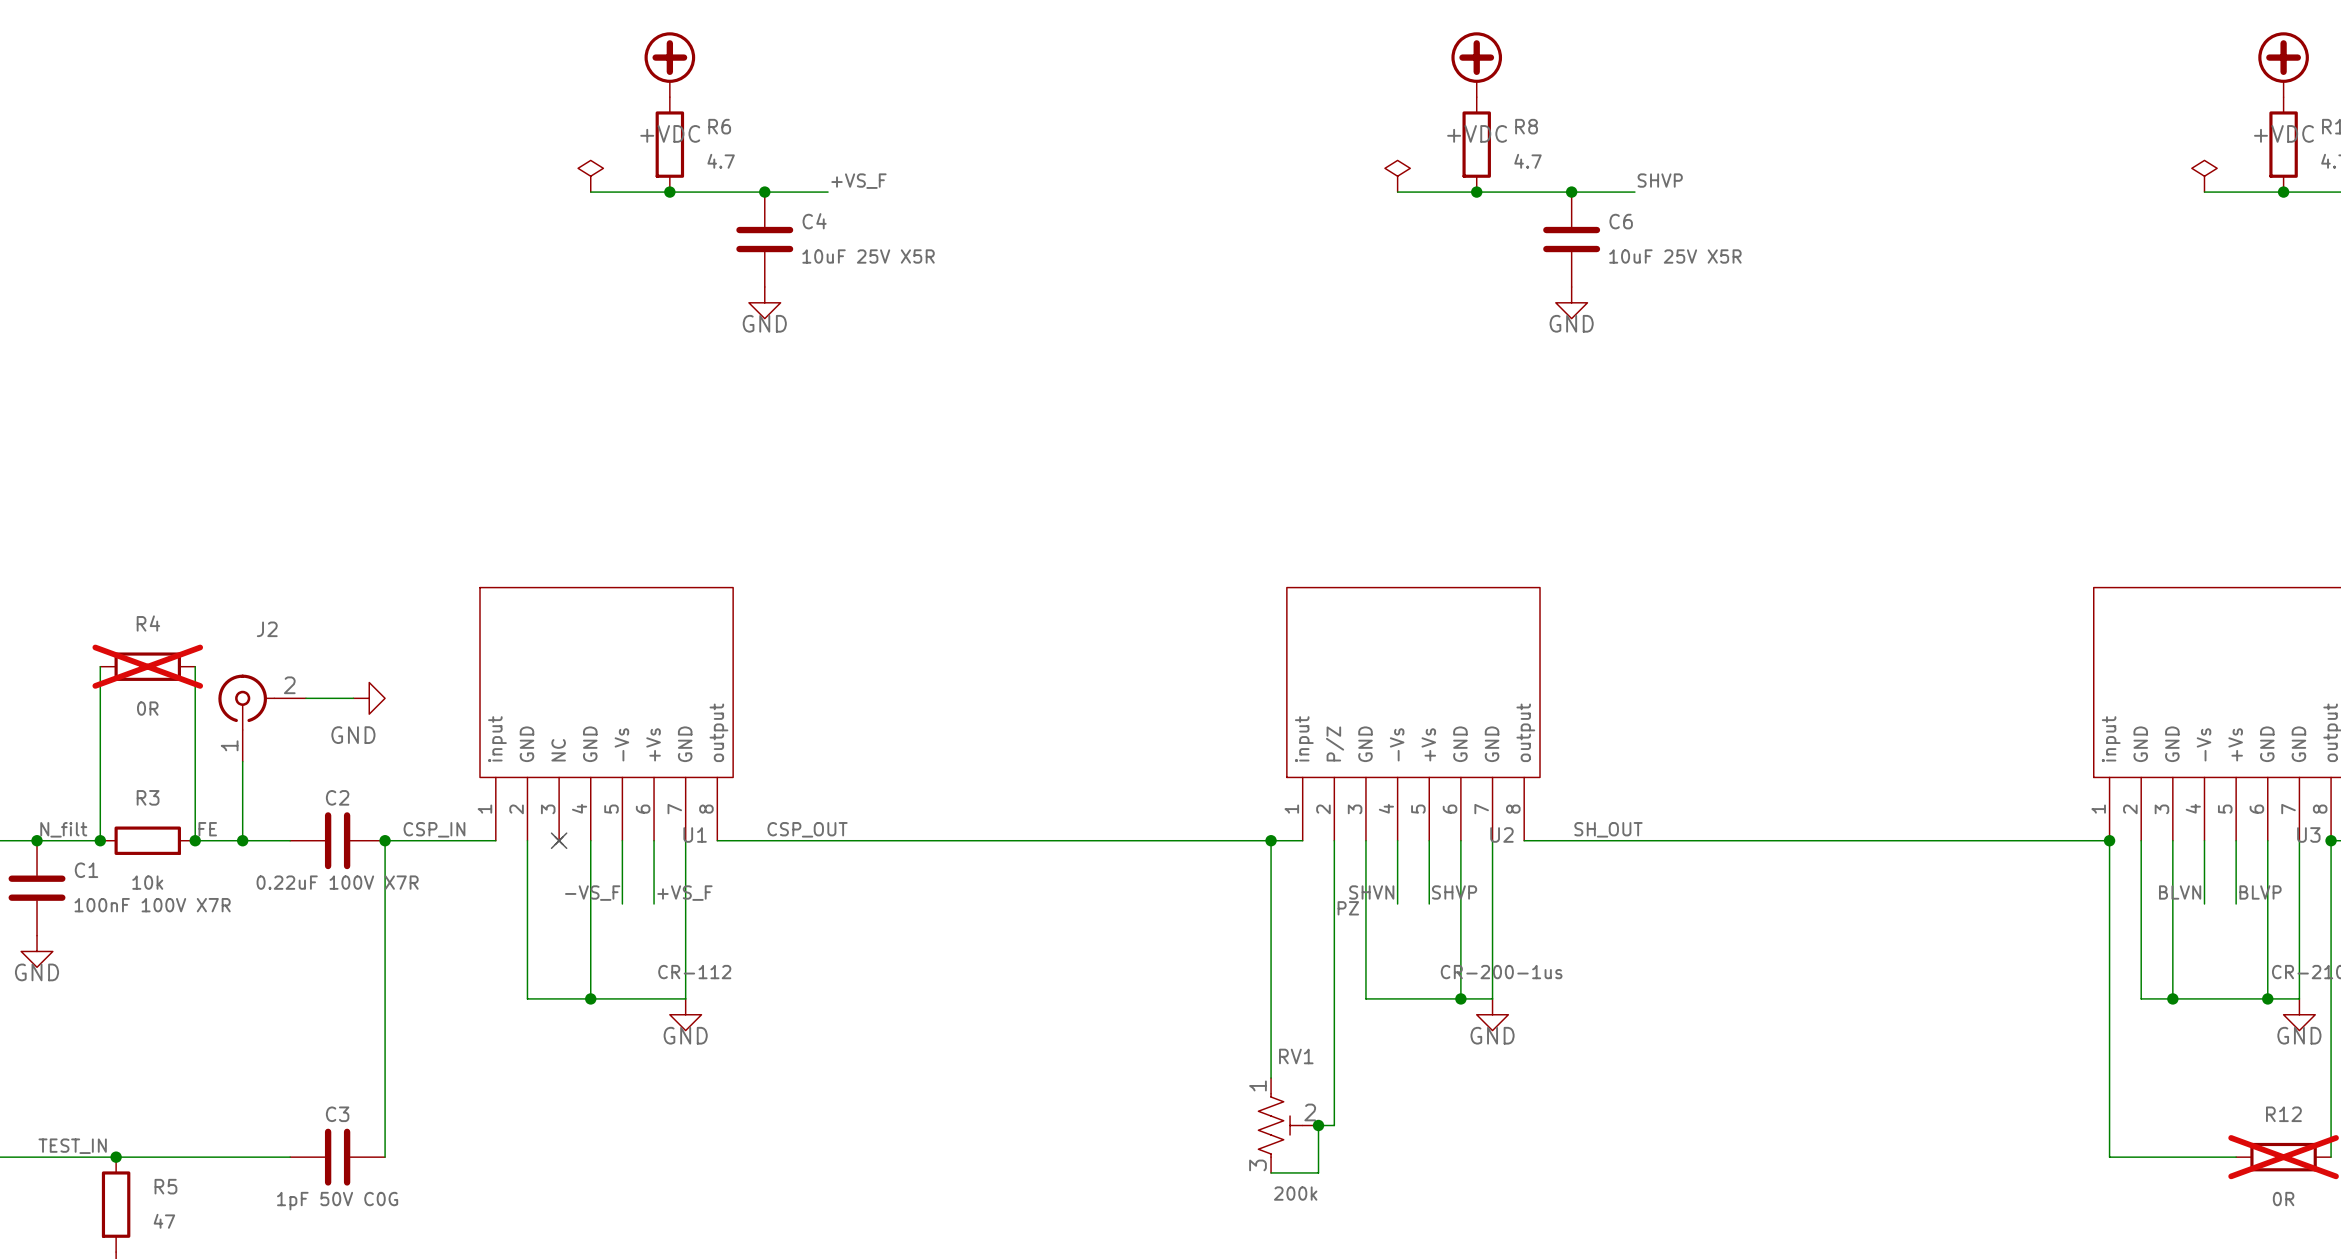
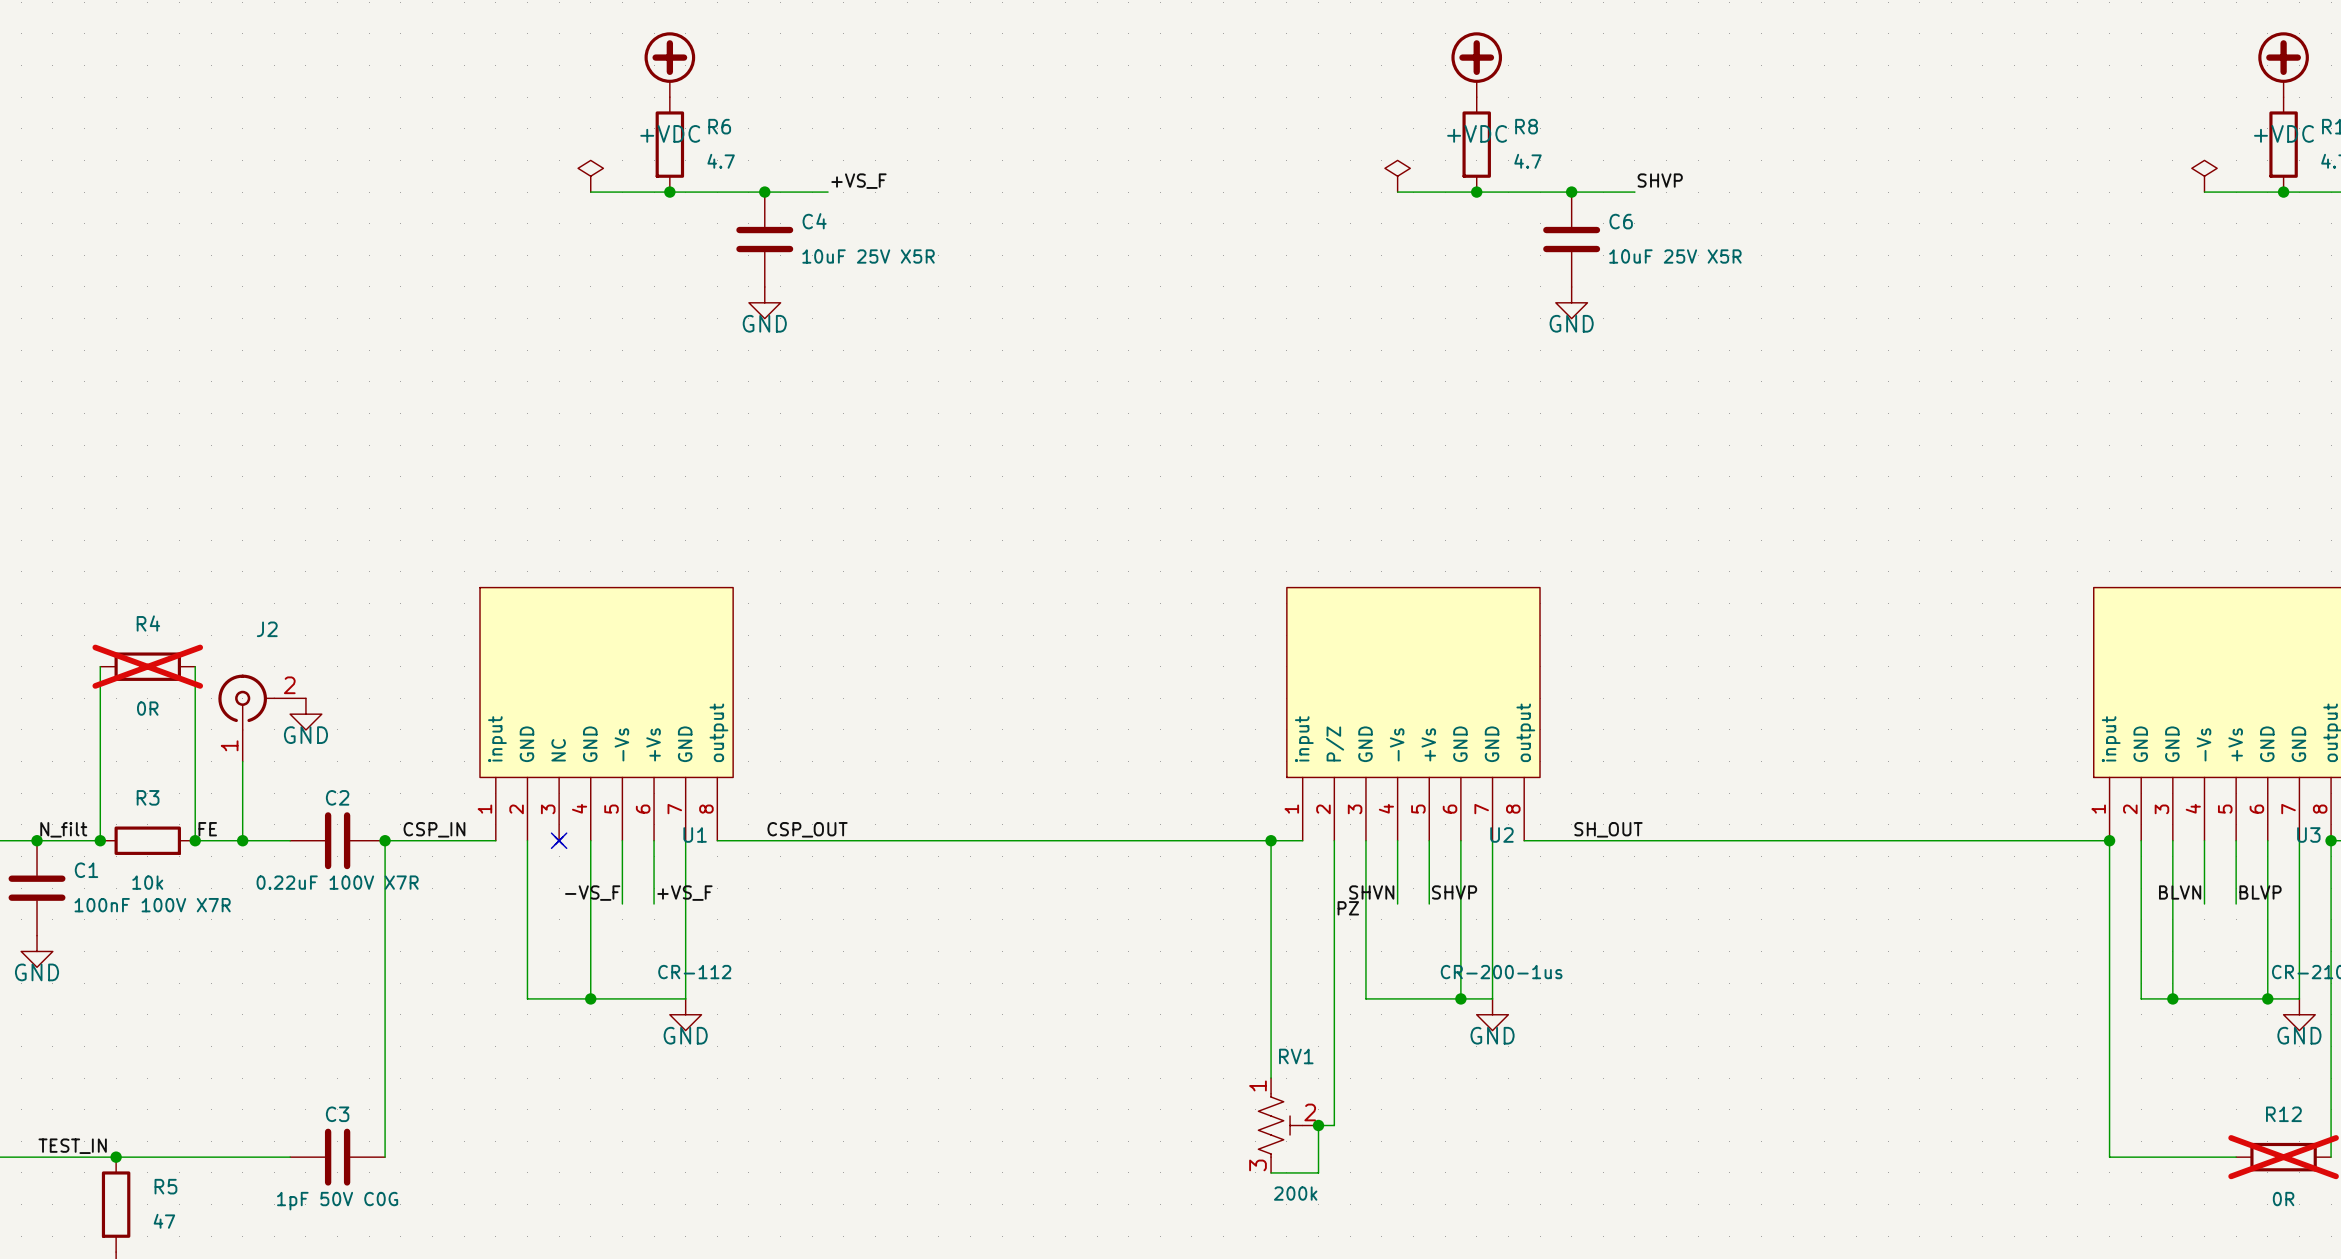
wire: (305, 698) (353, 698) -> none
power symbol rotation: 0° (369, 698) -> 90° clockwise (305, 714)
power symbol position: GND (369, 698) -> GND (305, 714)

